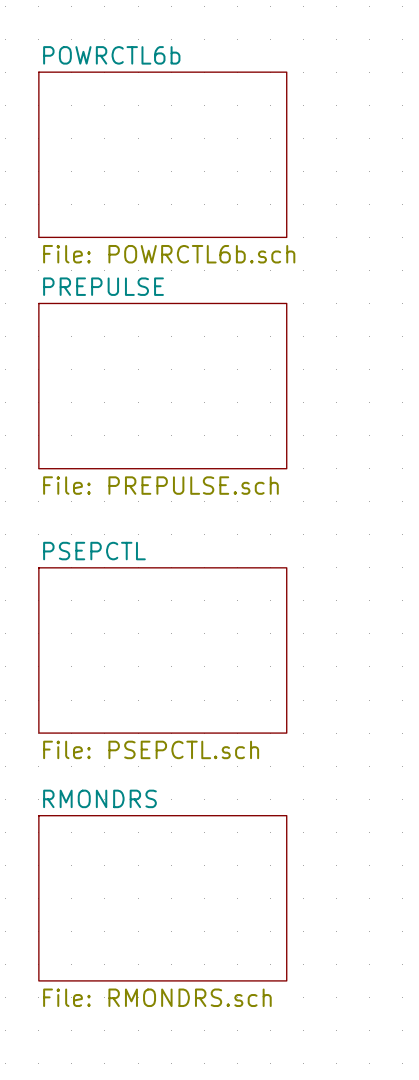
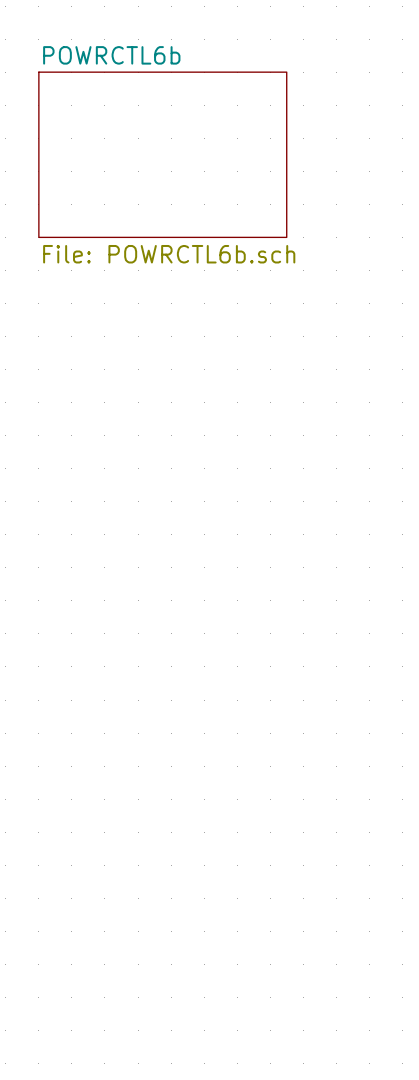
sheet PREPULSE: File: PREPULSE.sch (162, 386) -> none
sheet PSEPCTL: File: PSEPCTL.sch (162, 650) -> none
sheet RMONDRS: File: RMONDRS.sch (162, 898) -> none

